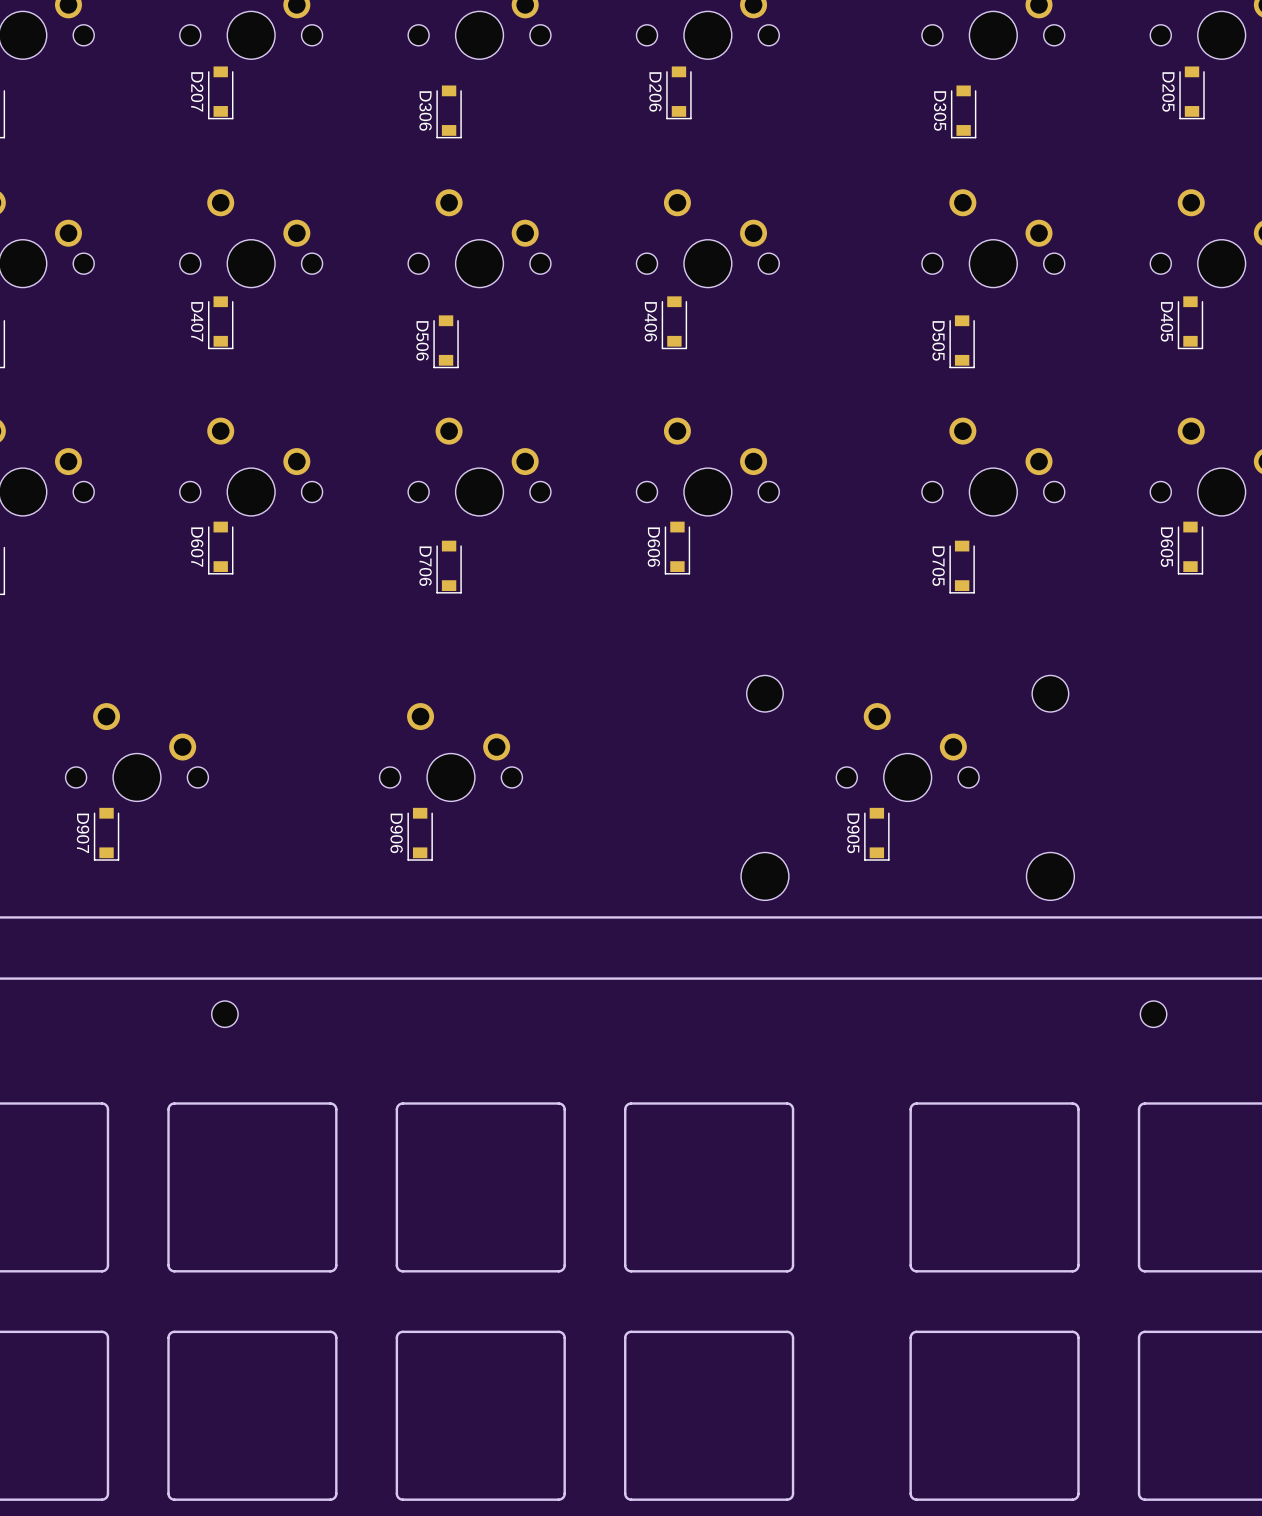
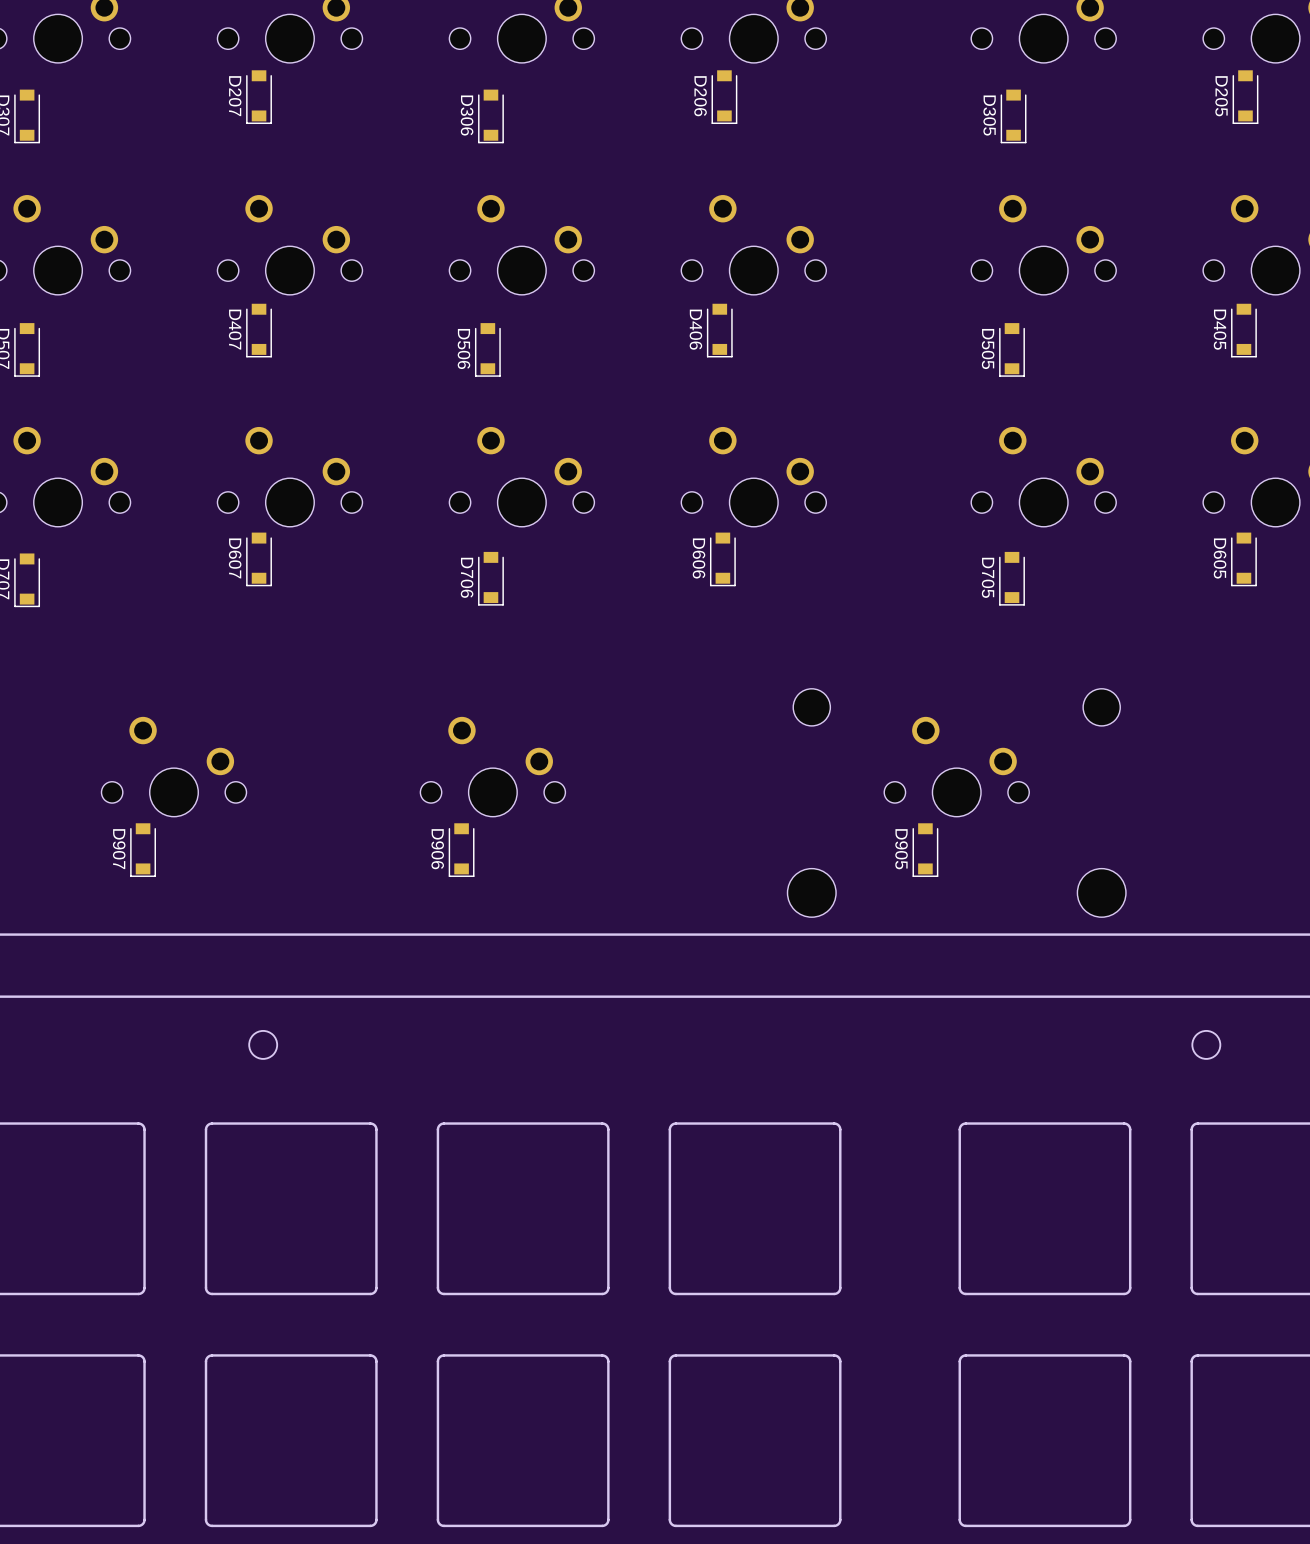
round board edge: none -> [248, 1030, 279, 1060]
round board edge: none -> [1191, 1030, 1222, 1060]
part: (224, 1014) -> none
part: (1153, 1014) -> none

